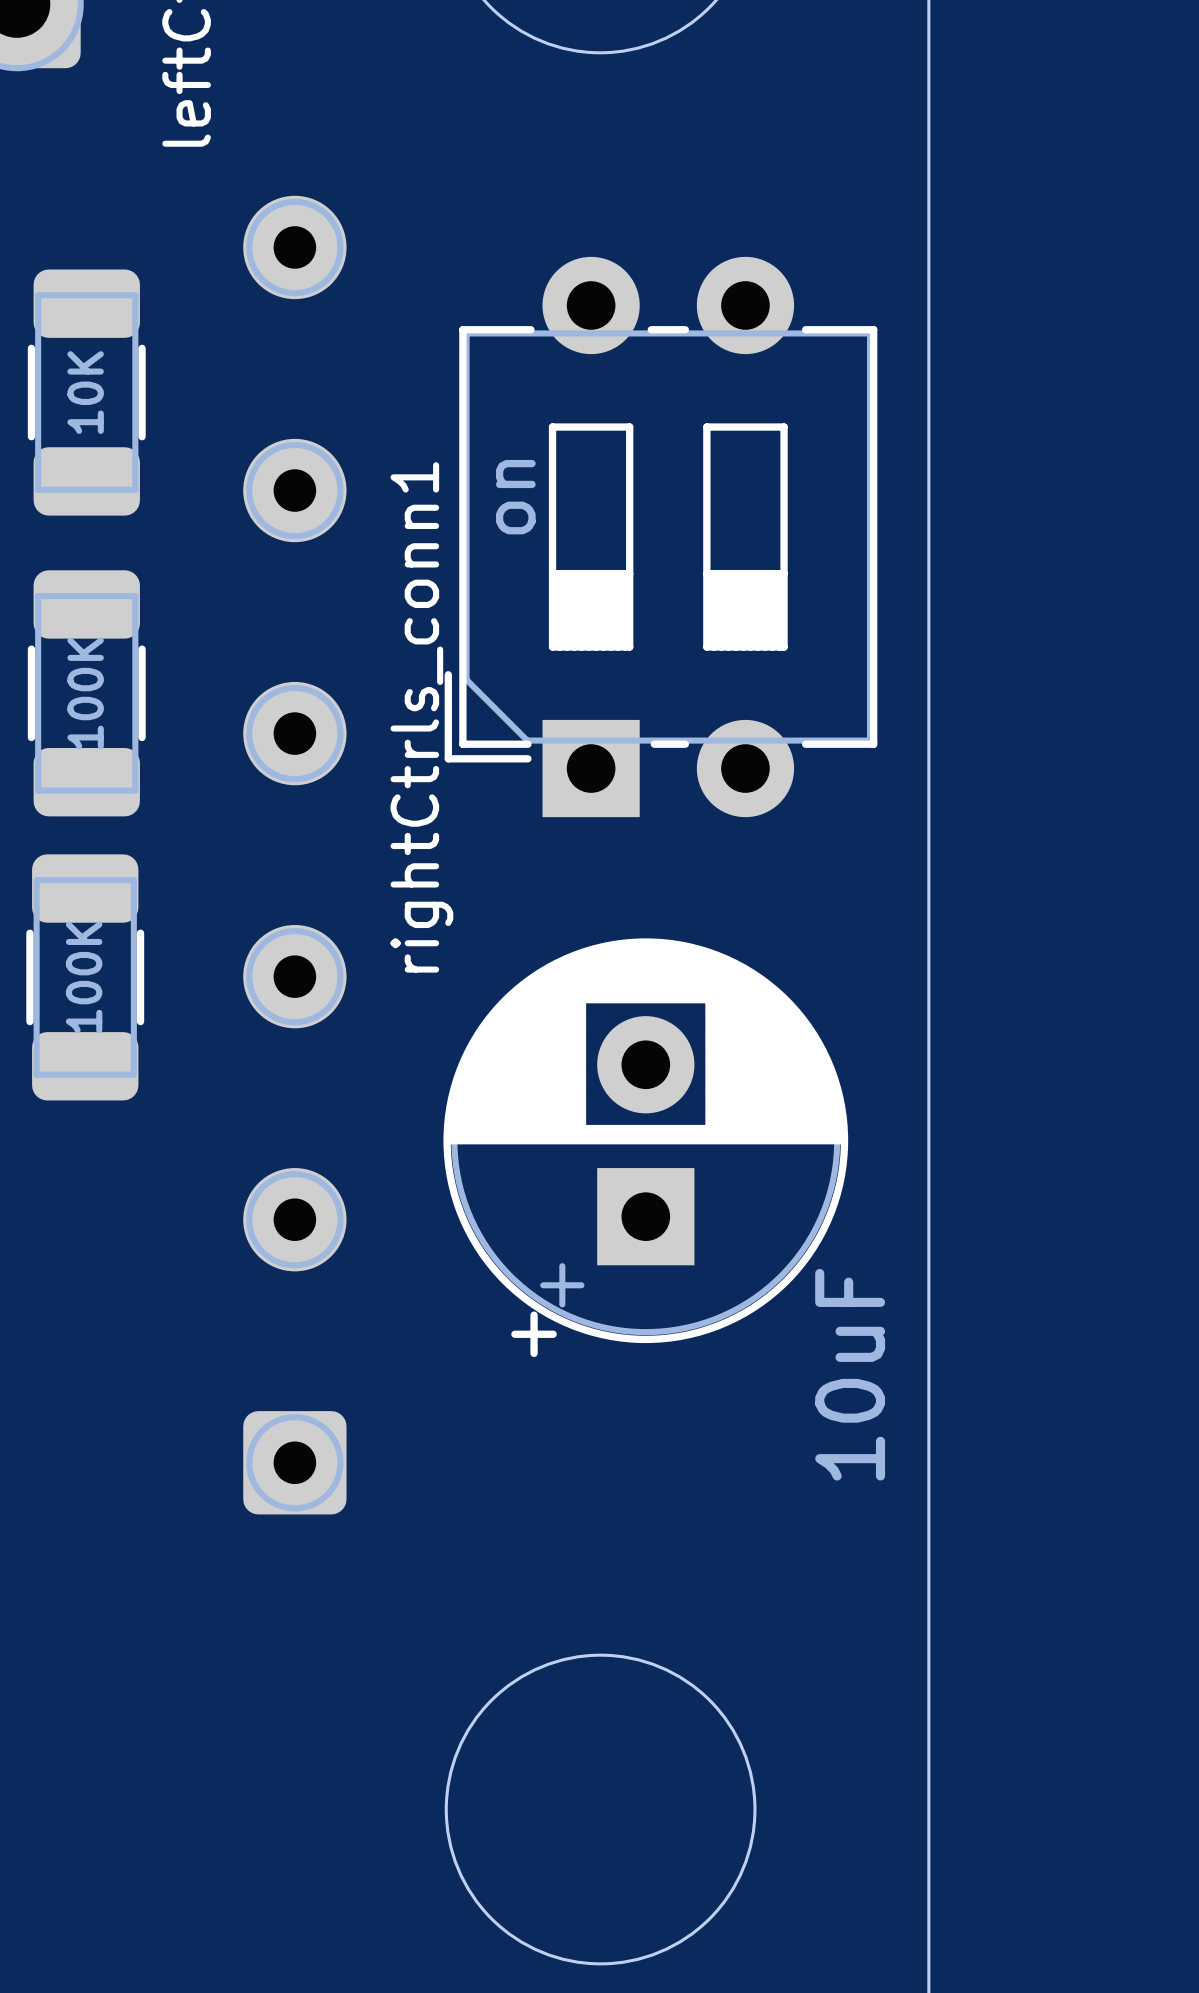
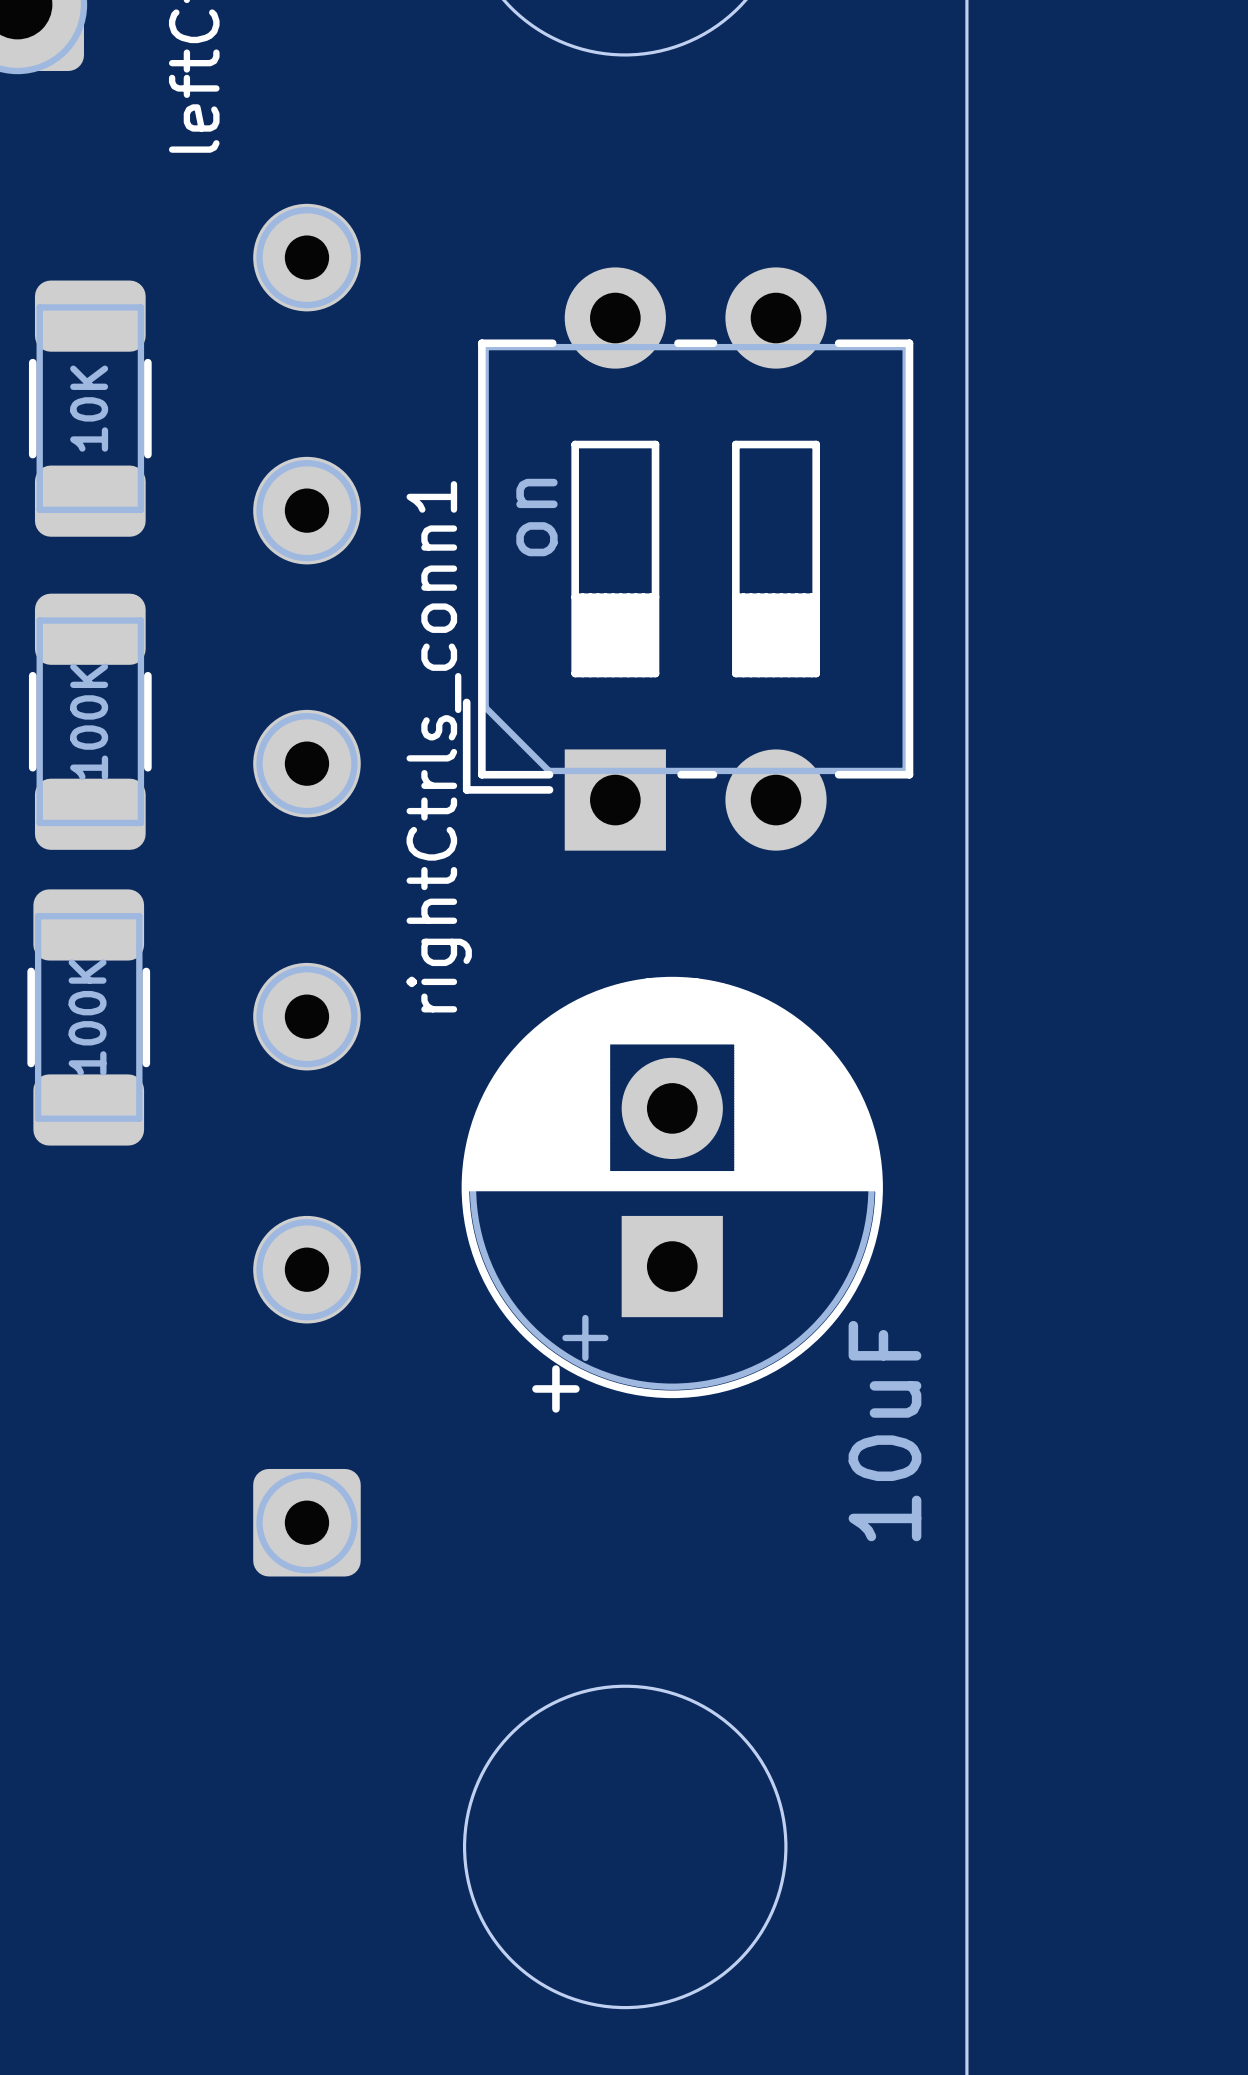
round board edge position: (600, 1809) -> (625, 1846)

